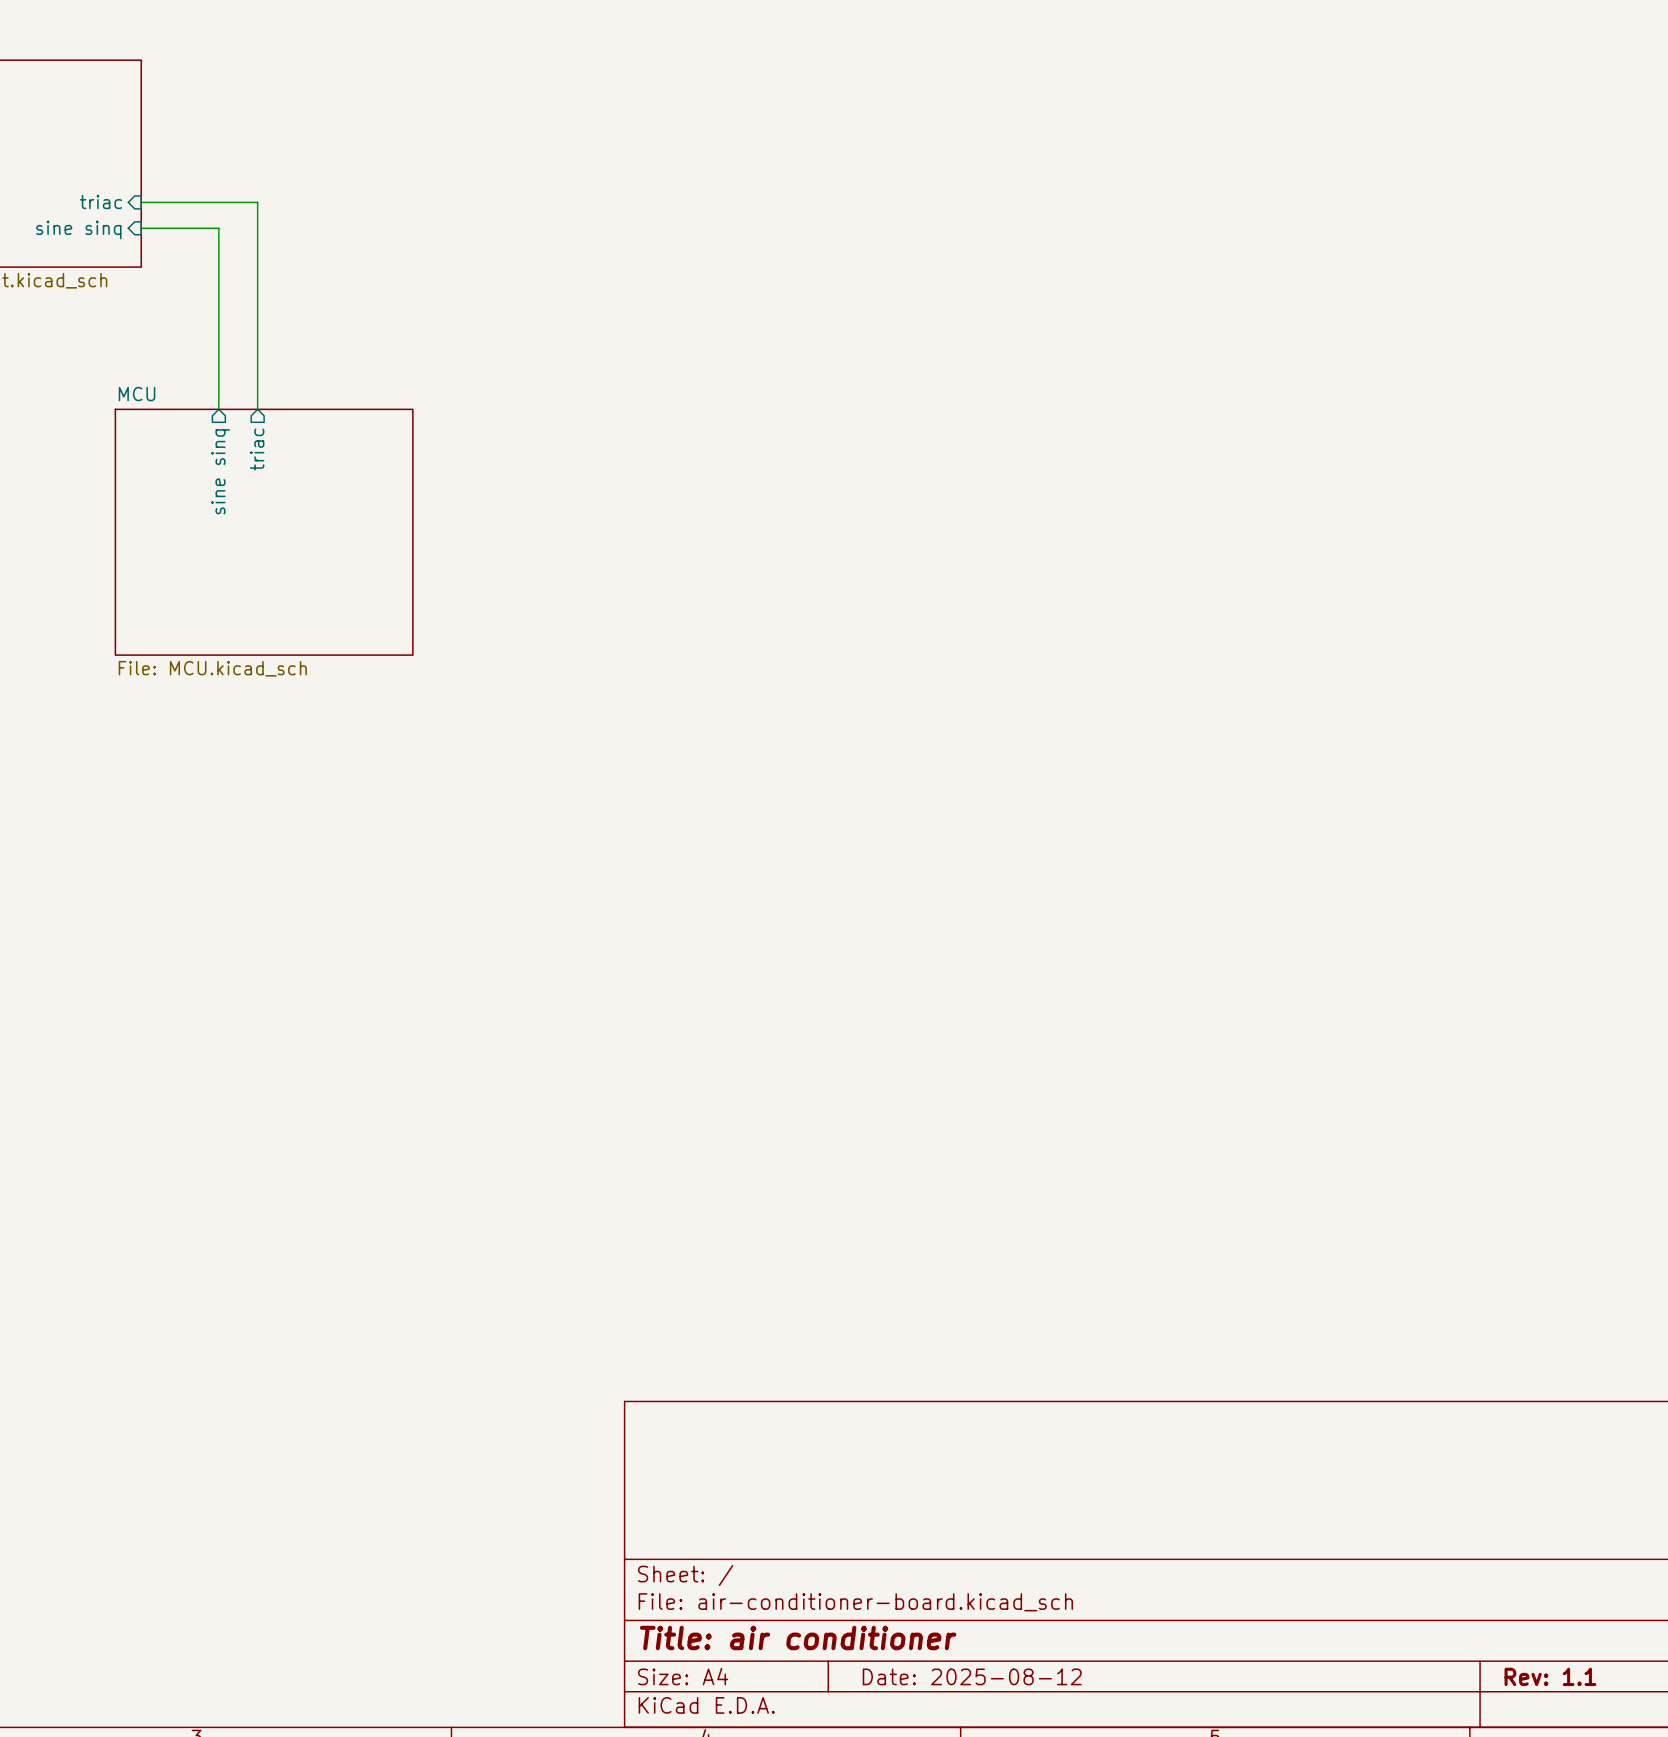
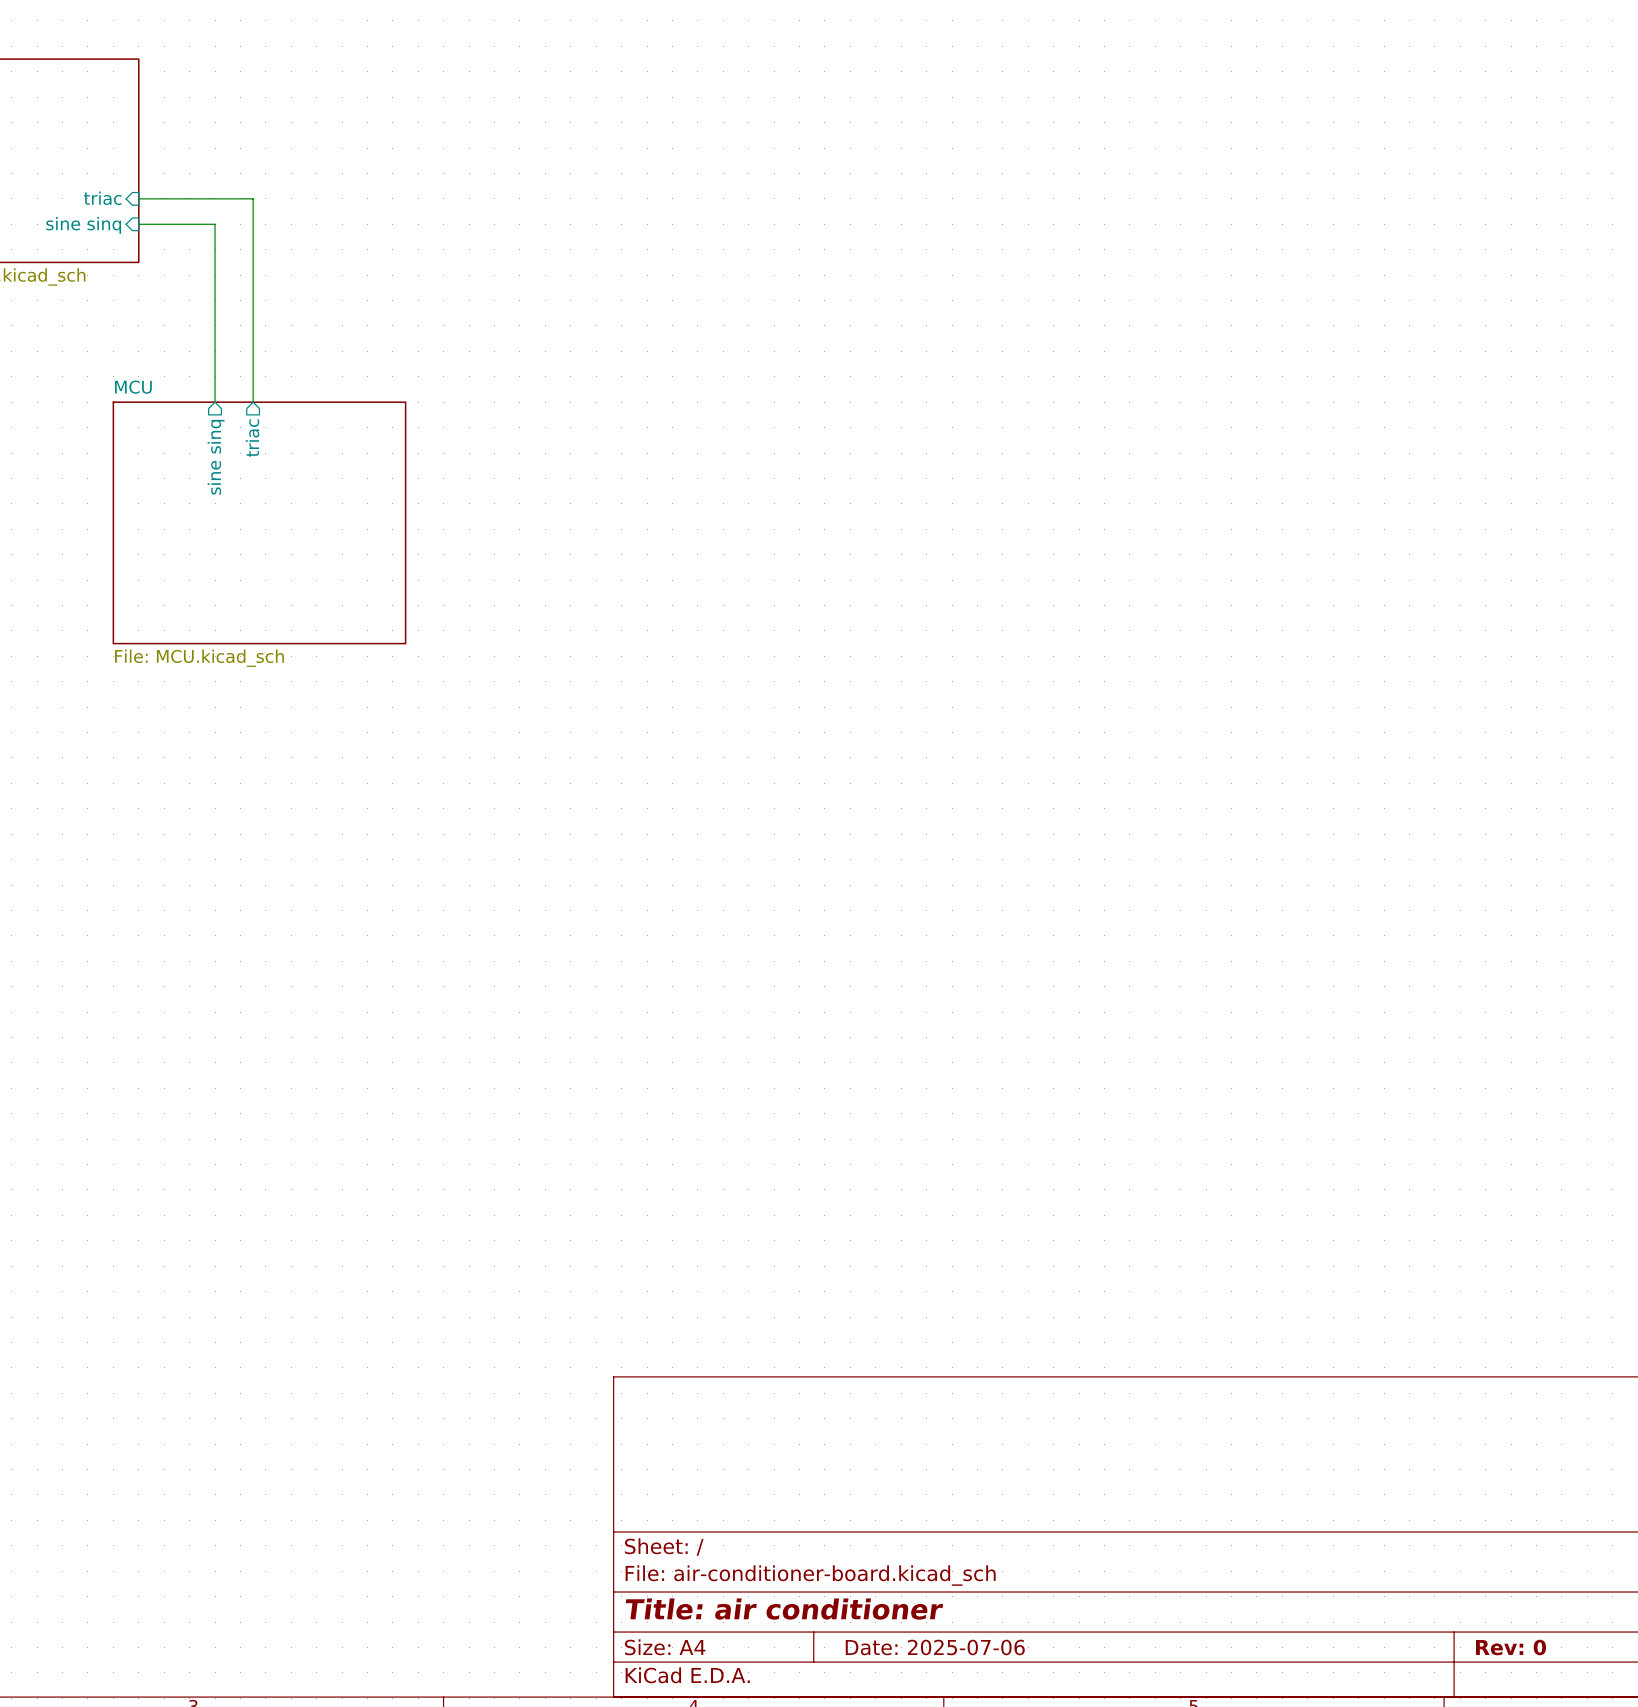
title block: Date: 2025-08-12 (972, 1676) -> Date: 2025-07-06 (935, 1647)
title block: Rev: 1.1 (1550, 1676) -> Rev: 0 (1511, 1647)

